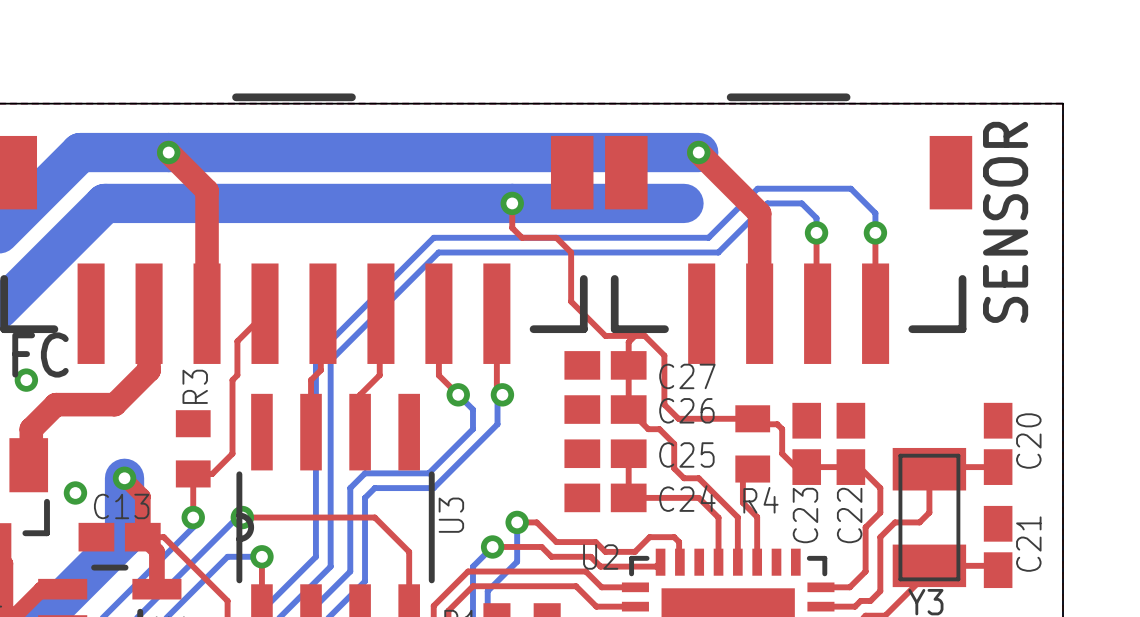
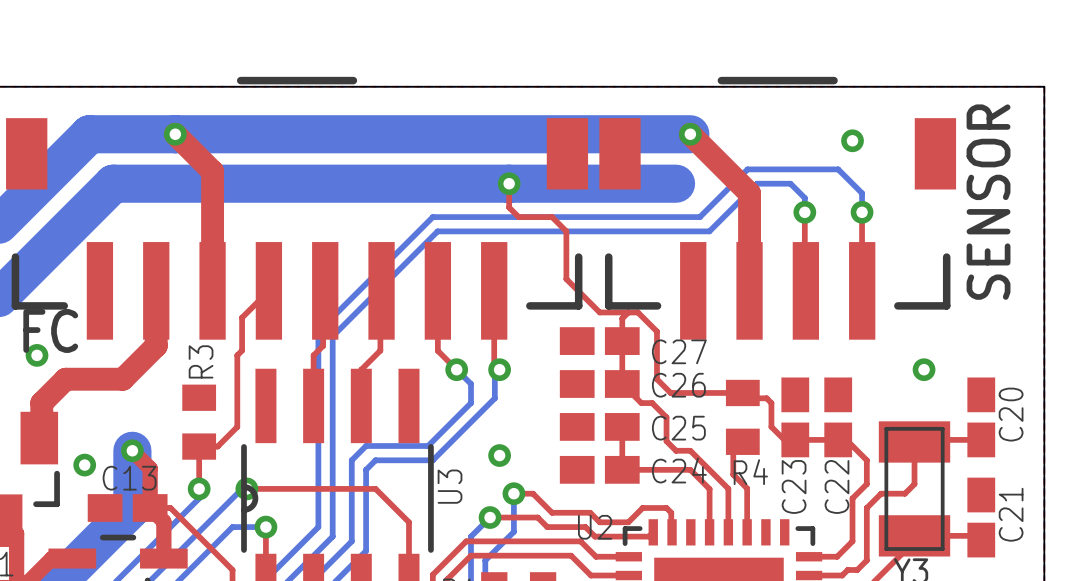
via: none -> (852, 140)
via: none -> (924, 369)
via: none -> (499, 455)

